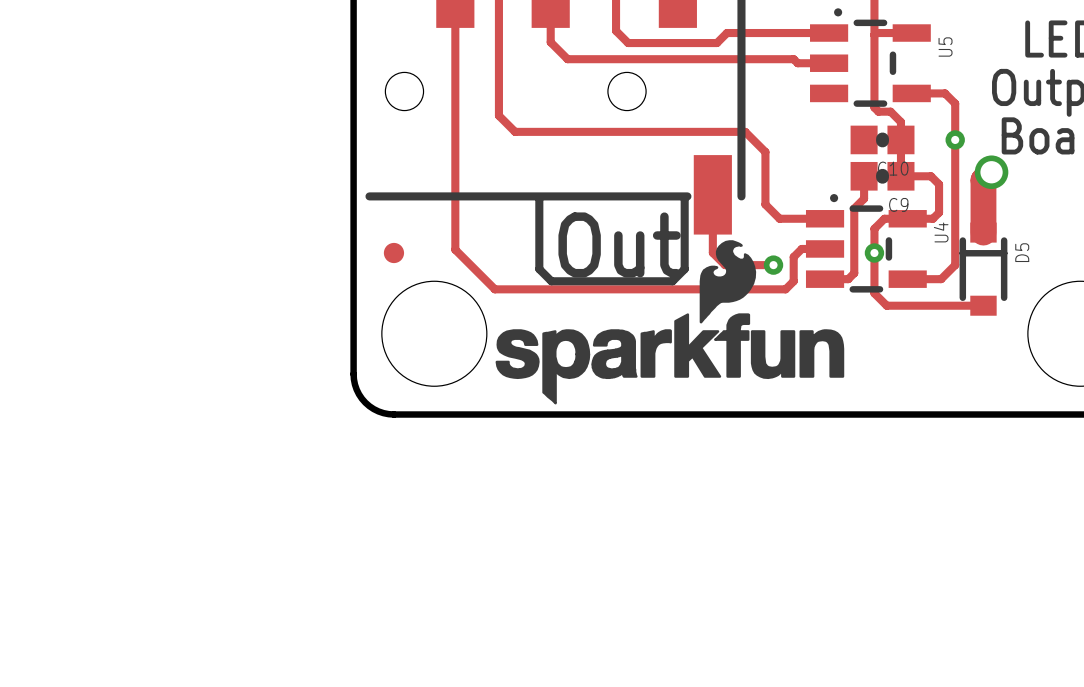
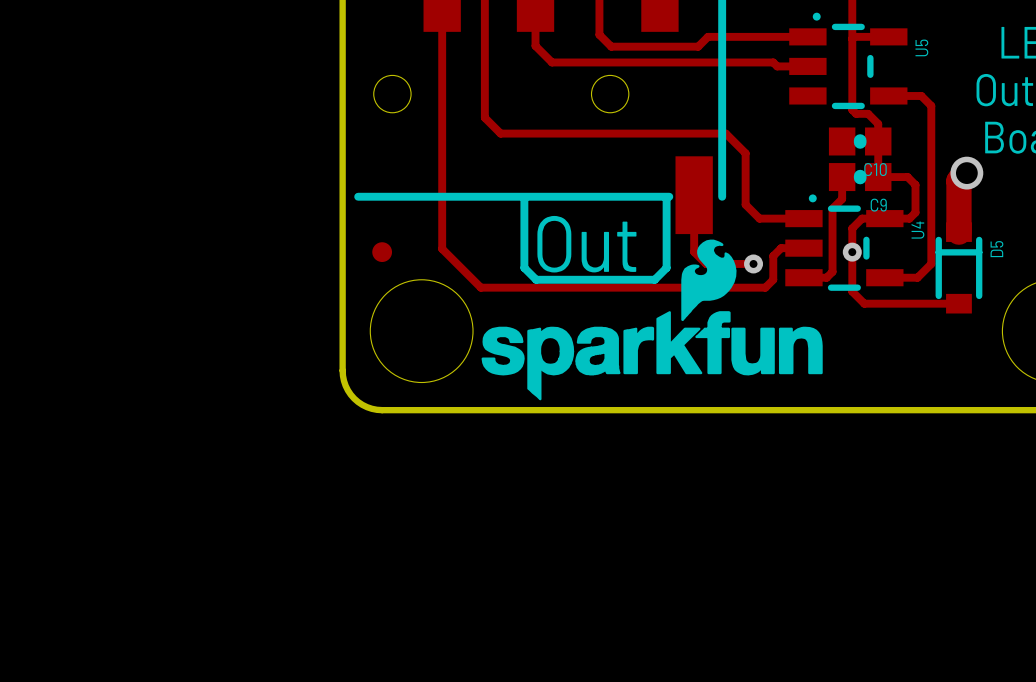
via: (955, 139) -> none

